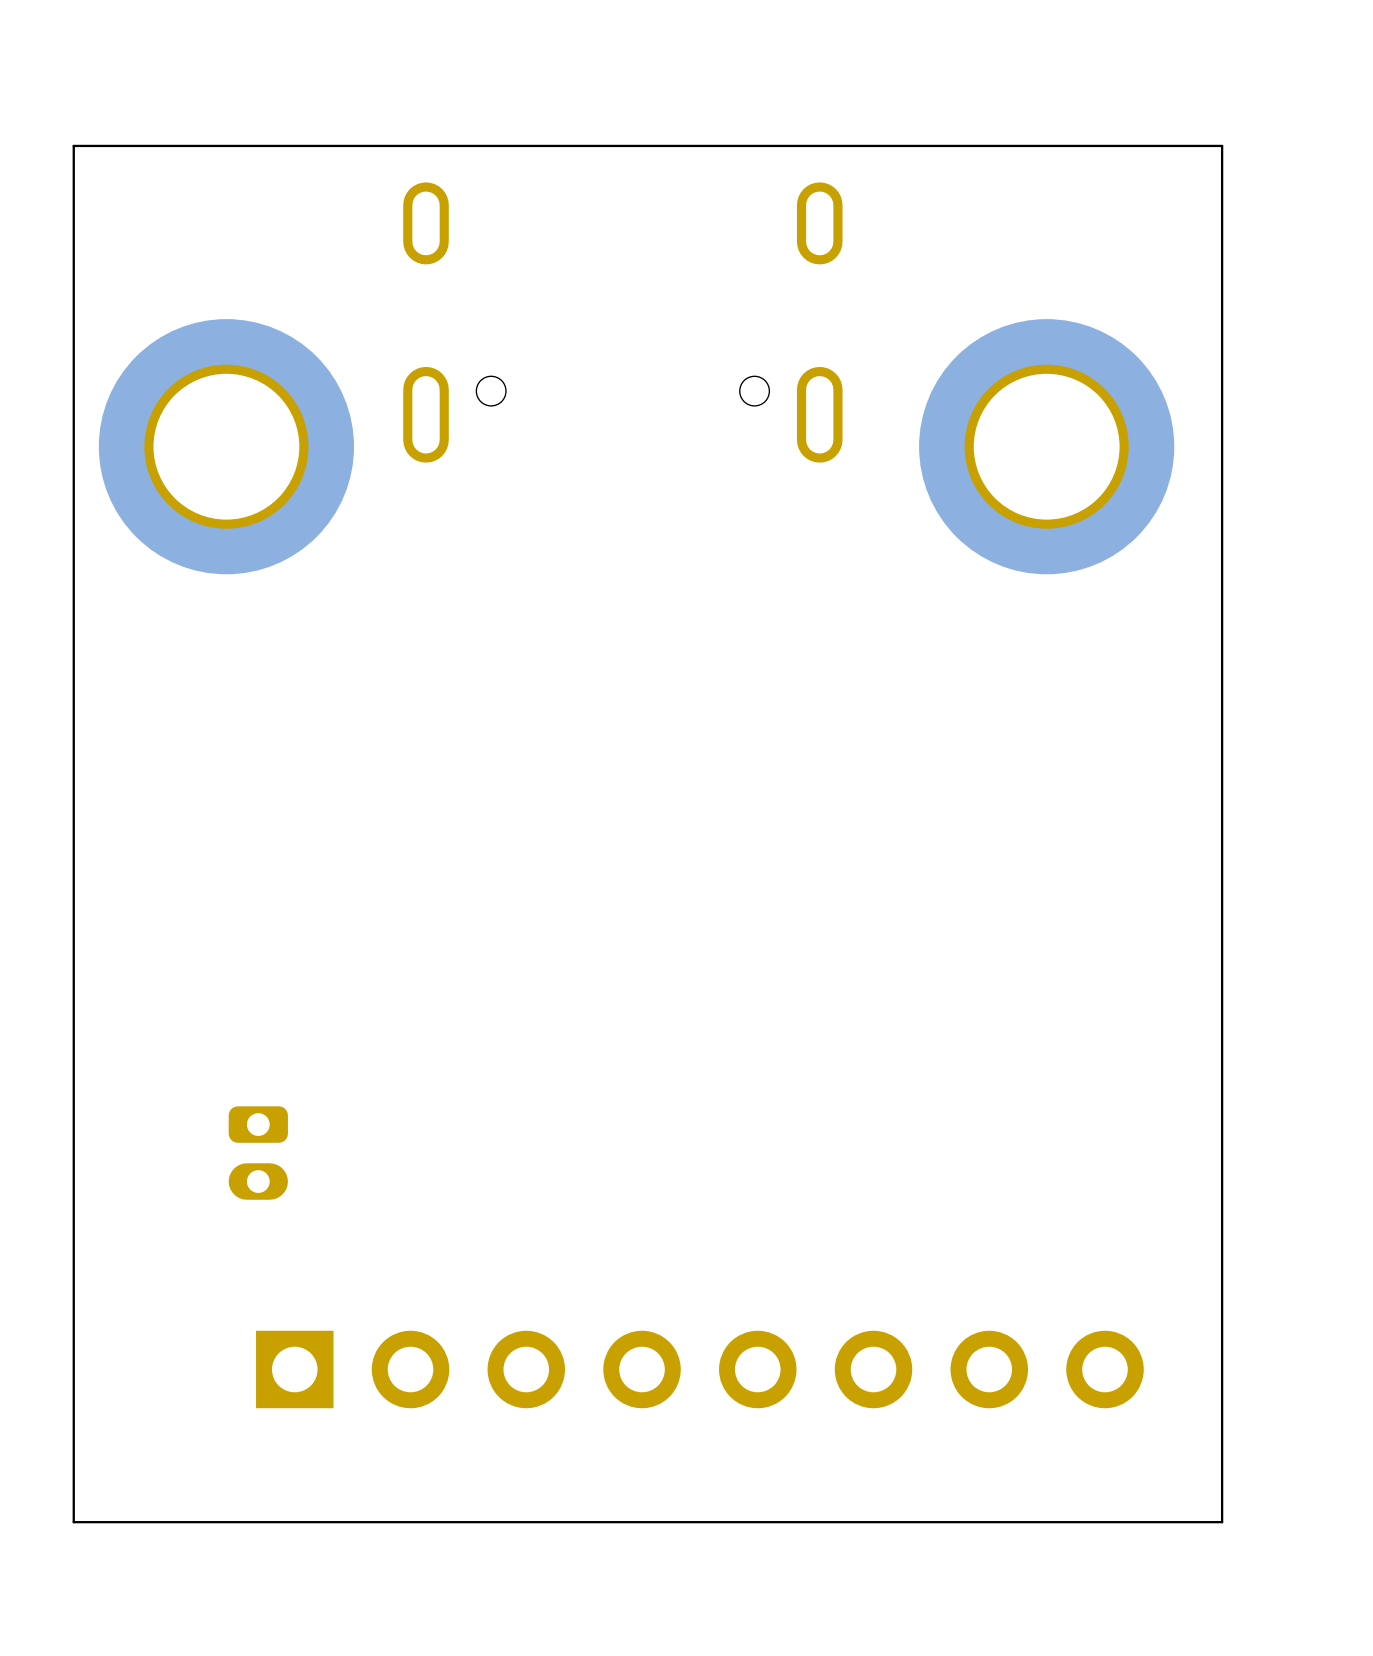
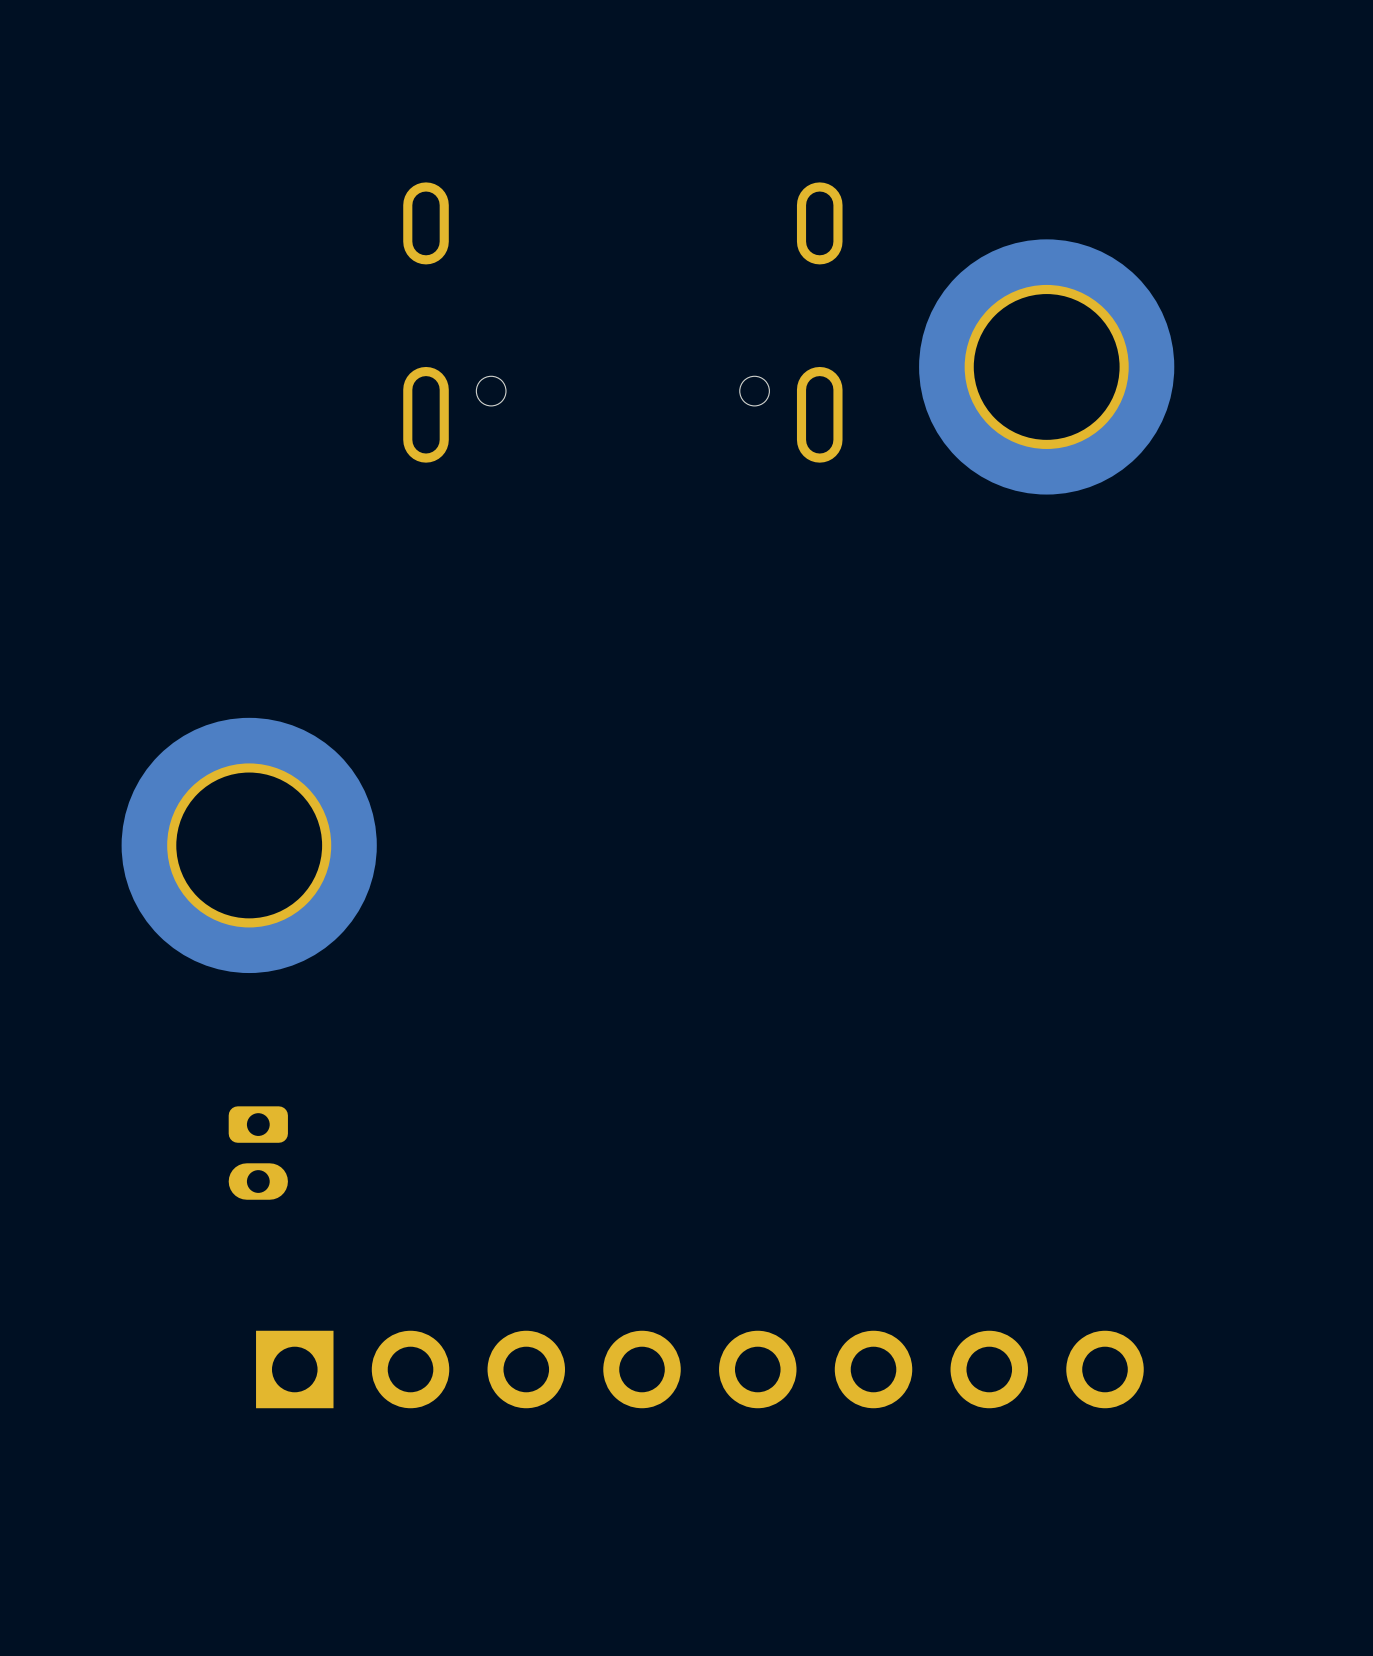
board edge: (1222, 145) (73, 145) (73, 1522) (1222, 1522) (1222, 145) -> none
part position: (226, 446) -> (249, 845)
part position: (1046, 446) -> (1046, 366)

